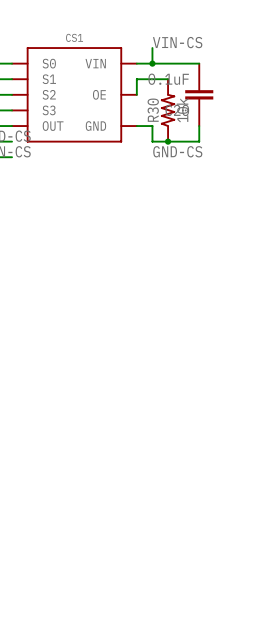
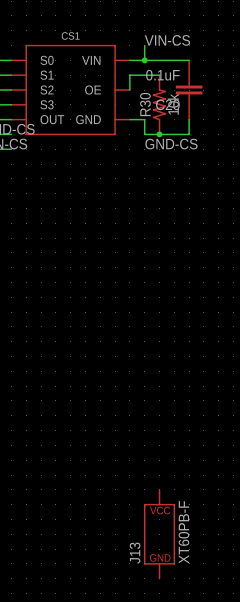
J13: none -> XT60PB-F (159, 534)

